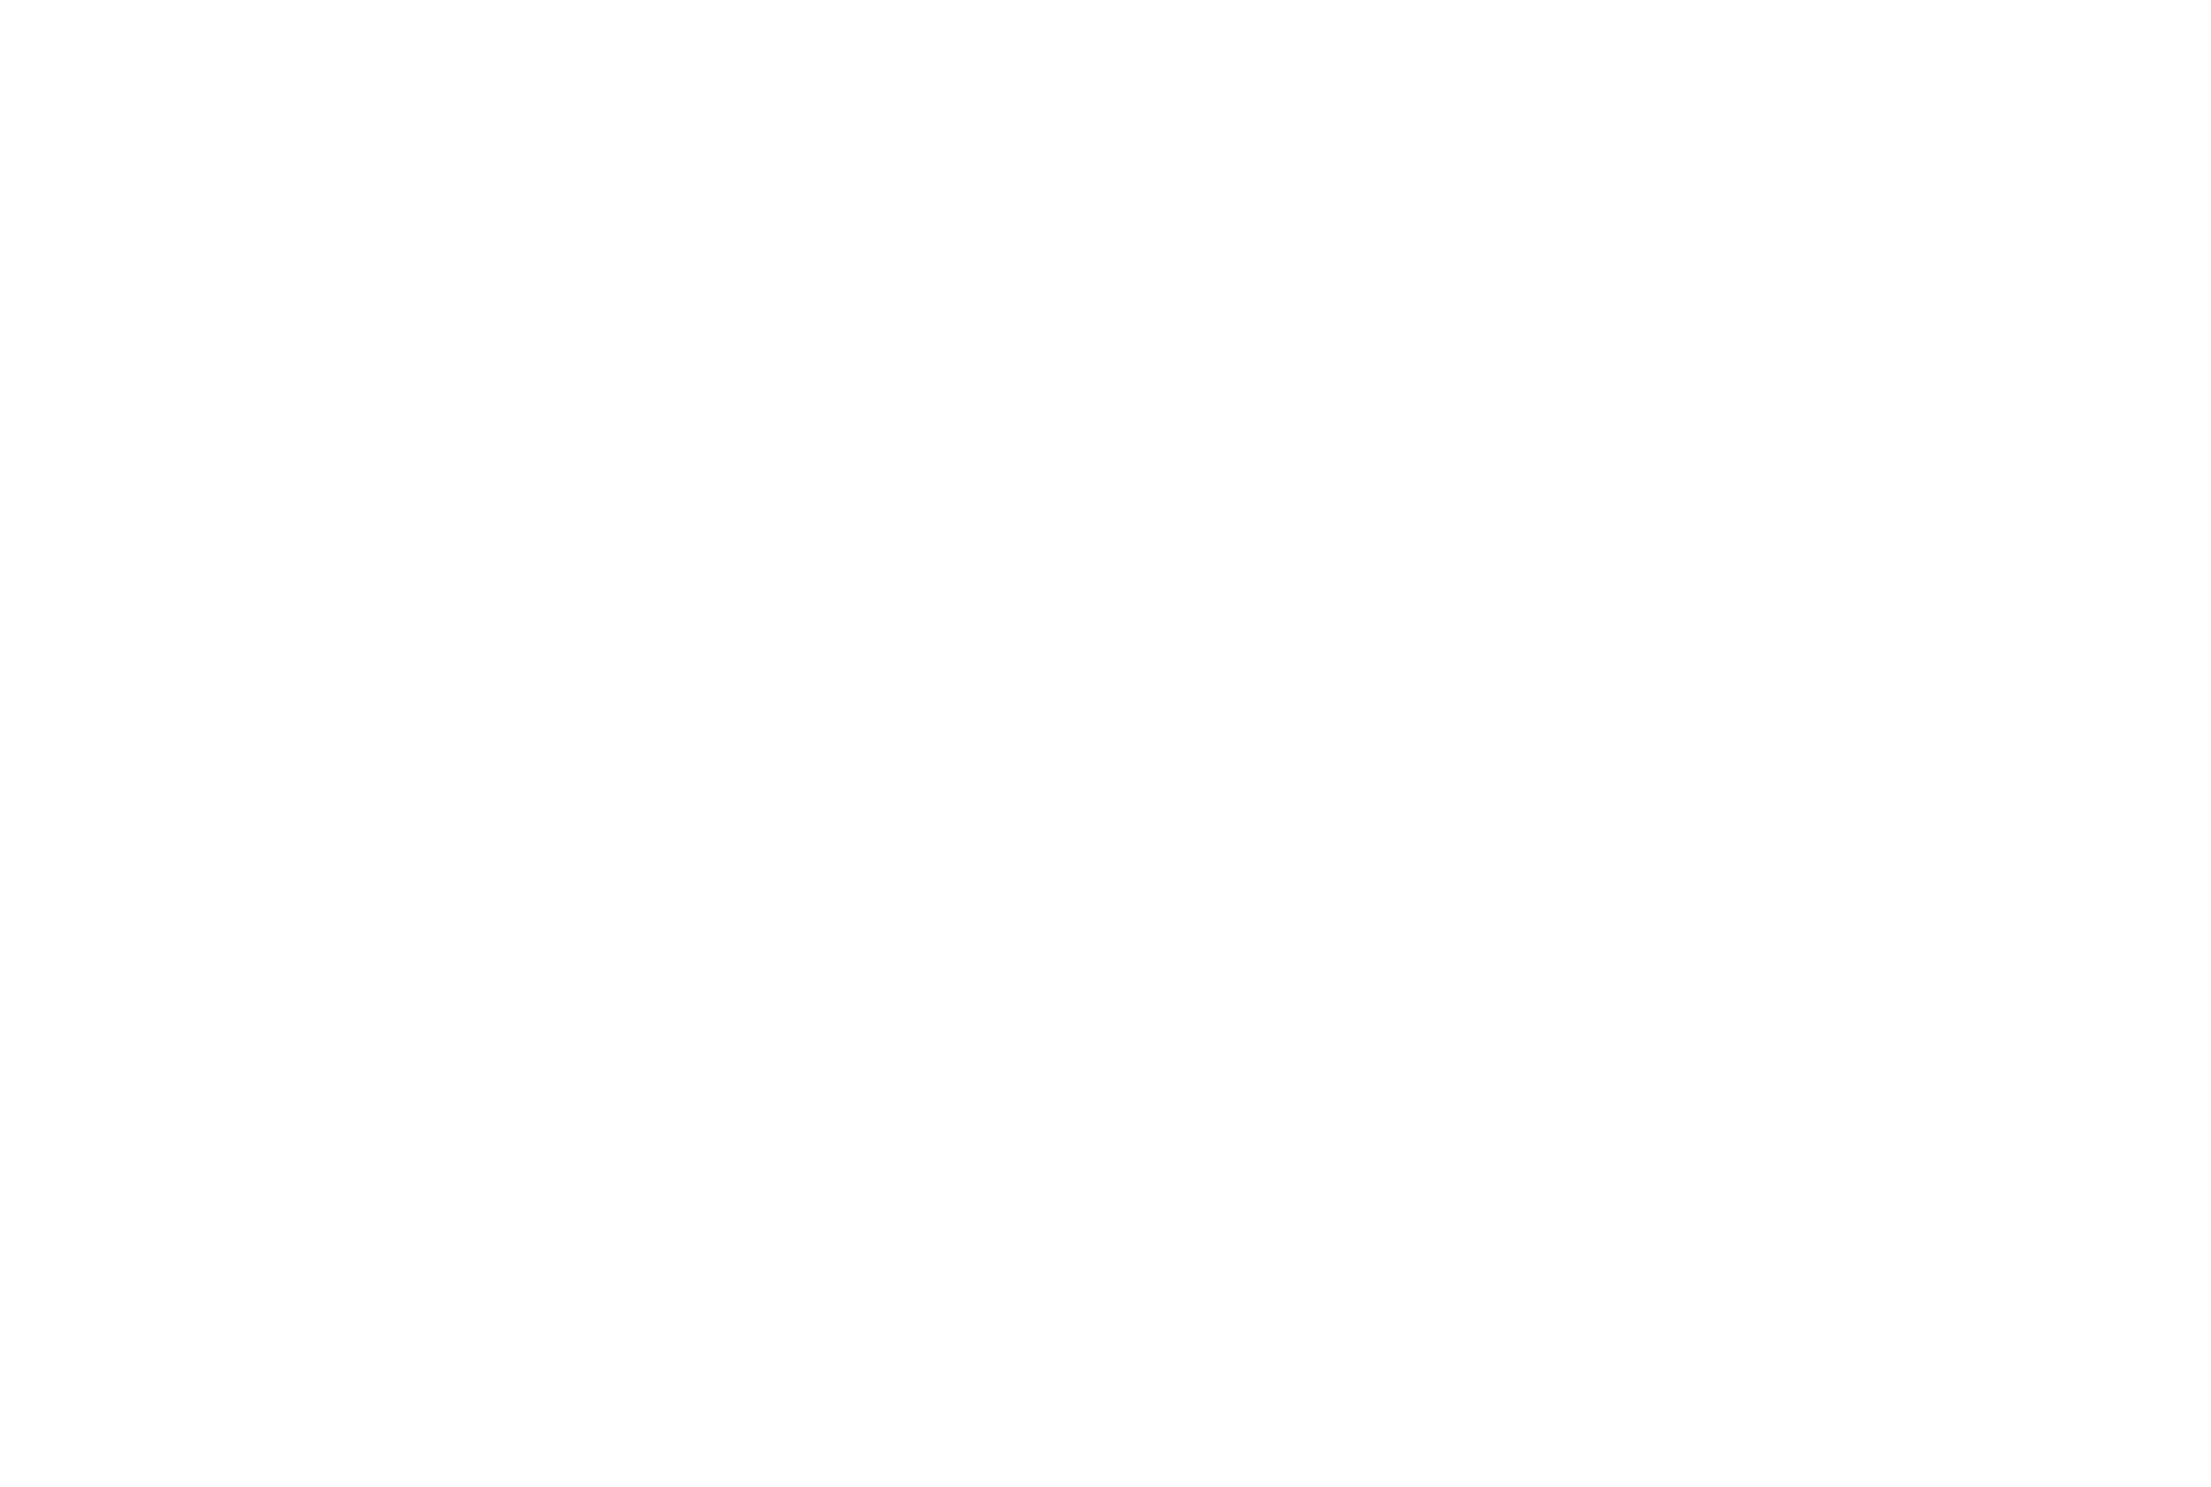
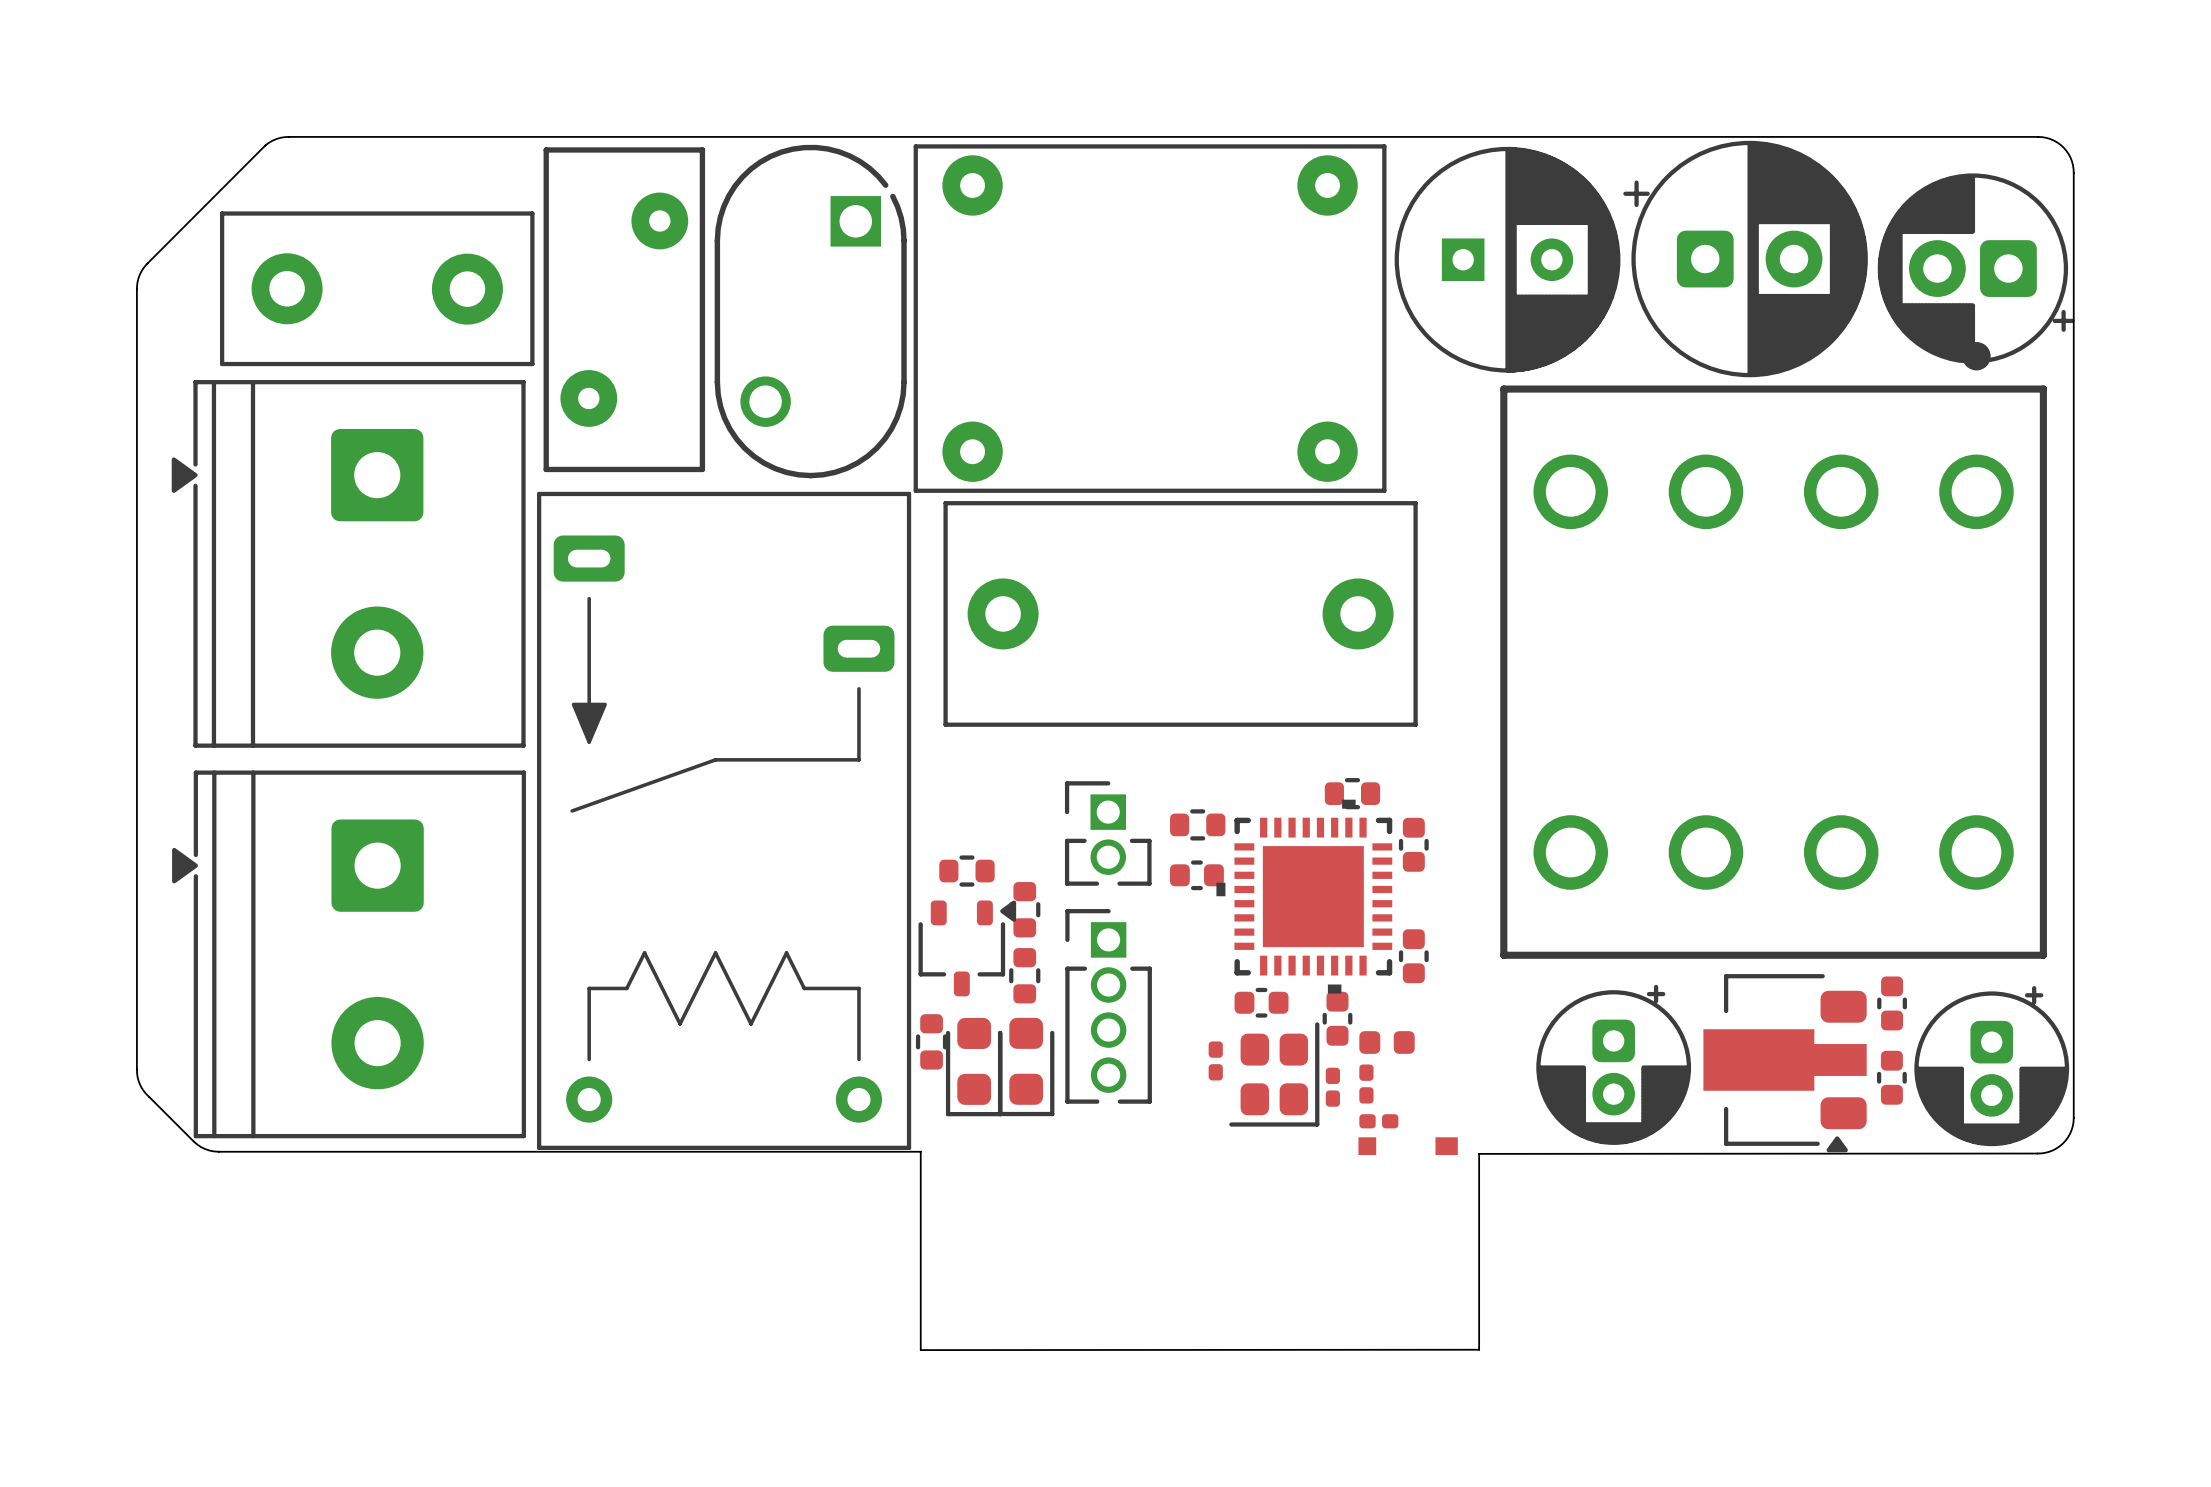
board edge: none -> (289, 136) (2038, 136) (2053, 140) (2068, 153) (2073, 173) (2073, 1118) (2070, 1133) (2056, 1148) (2037, 1153) (1479, 1153) (1479, 1349) (920, 1350) (920, 1151) (218, 1151) (201, 1147) (146, 1094) (140, 1084) (137, 1073) (137, 285) (139, 275) (145, 266) (265, 145) (276, 138) (289, 136)
part: none -> (1507, 259)
part: none -> (1745, 259)
part: none -> (1976, 268)
part: none -> (377, 288)
part: none -> (624, 309)
part: none -> (810, 311)
part: none -> (1150, 318)
part: none -> (348, 563)
part: none -> (1180, 613)
part: none -> (1773, 650)
part: none -> (1352, 793)
part: none -> (724, 820)
part: none -> (1197, 824)
part: none -> (1108, 833)
part: none -> (1413, 844)
part: none -> (966, 871)
part: none -> (1196, 875)
part: none -> (1304, 896)
part: none -> (1024, 909)
part: none -> (967, 948)
part: none -> (349, 954)
part: none -> (1413, 956)
part: none -> (1024, 975)
part: none -> (1261, 1002)
part: none -> (1892, 1003)
part: none -> (1108, 1006)
part: none -> (1337, 1018)
part: none -> (931, 1041)
part: none -> (1387, 1042)
part: none -> (1215, 1060)
part: none -> (1785, 1063)
part: none -> (1613, 1064)
part: none -> (1026, 1066)
part: none -> (1991, 1066)
part: none -> (974, 1067)
part: none -> (1274, 1074)
part: none -> (1891, 1077)
part: none -> (1366, 1084)
part: none -> (1332, 1087)
part: none -> (1378, 1121)
part: none -> (1408, 1146)

